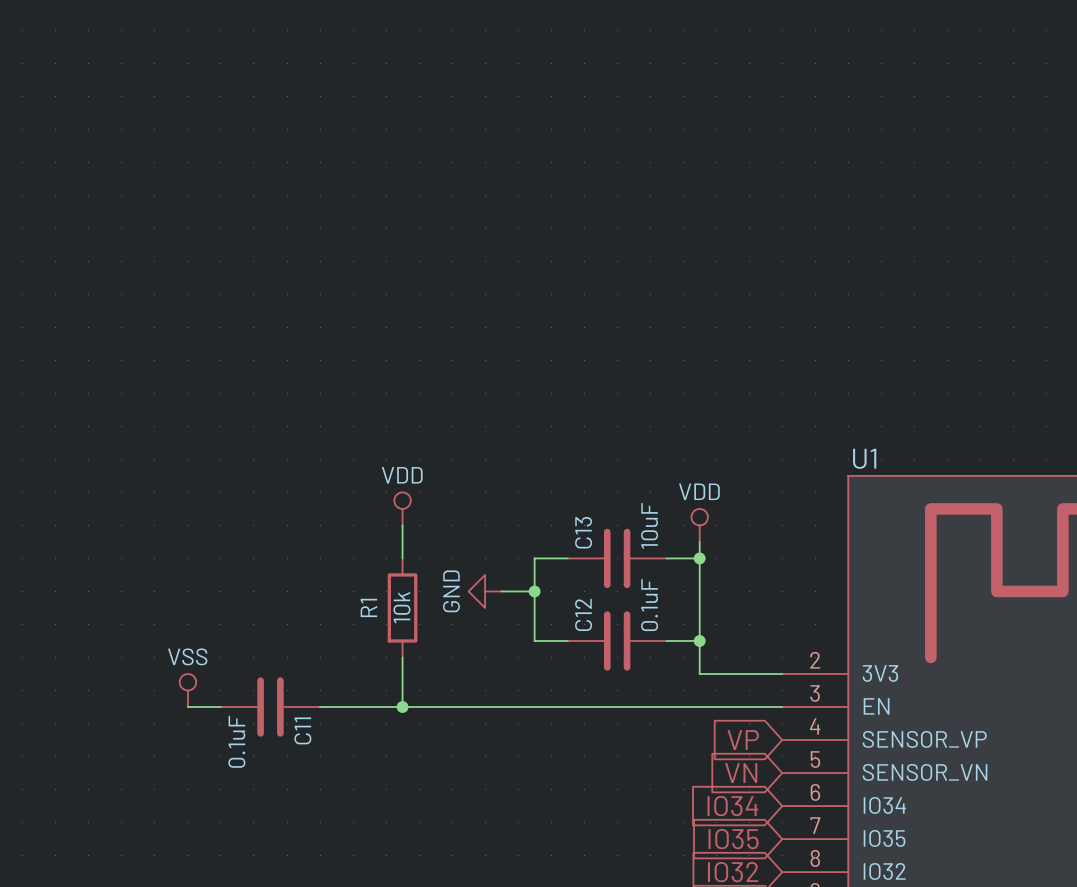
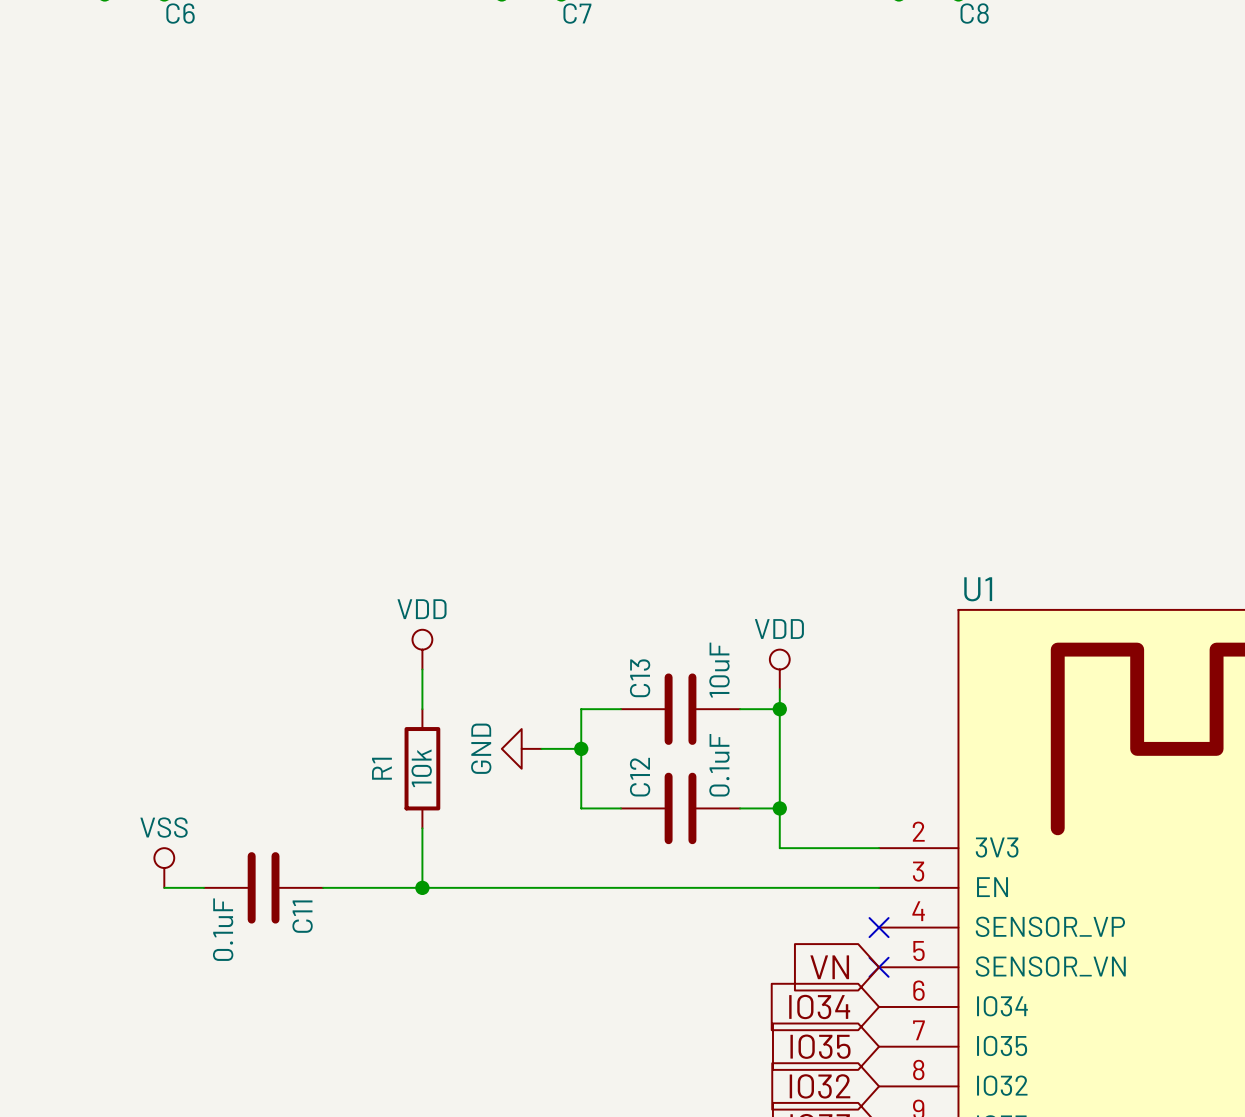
global label: VP (743, 740) -> none
no-connect mark: none -> (879, 927)
no-connect mark: none -> (879, 967)

